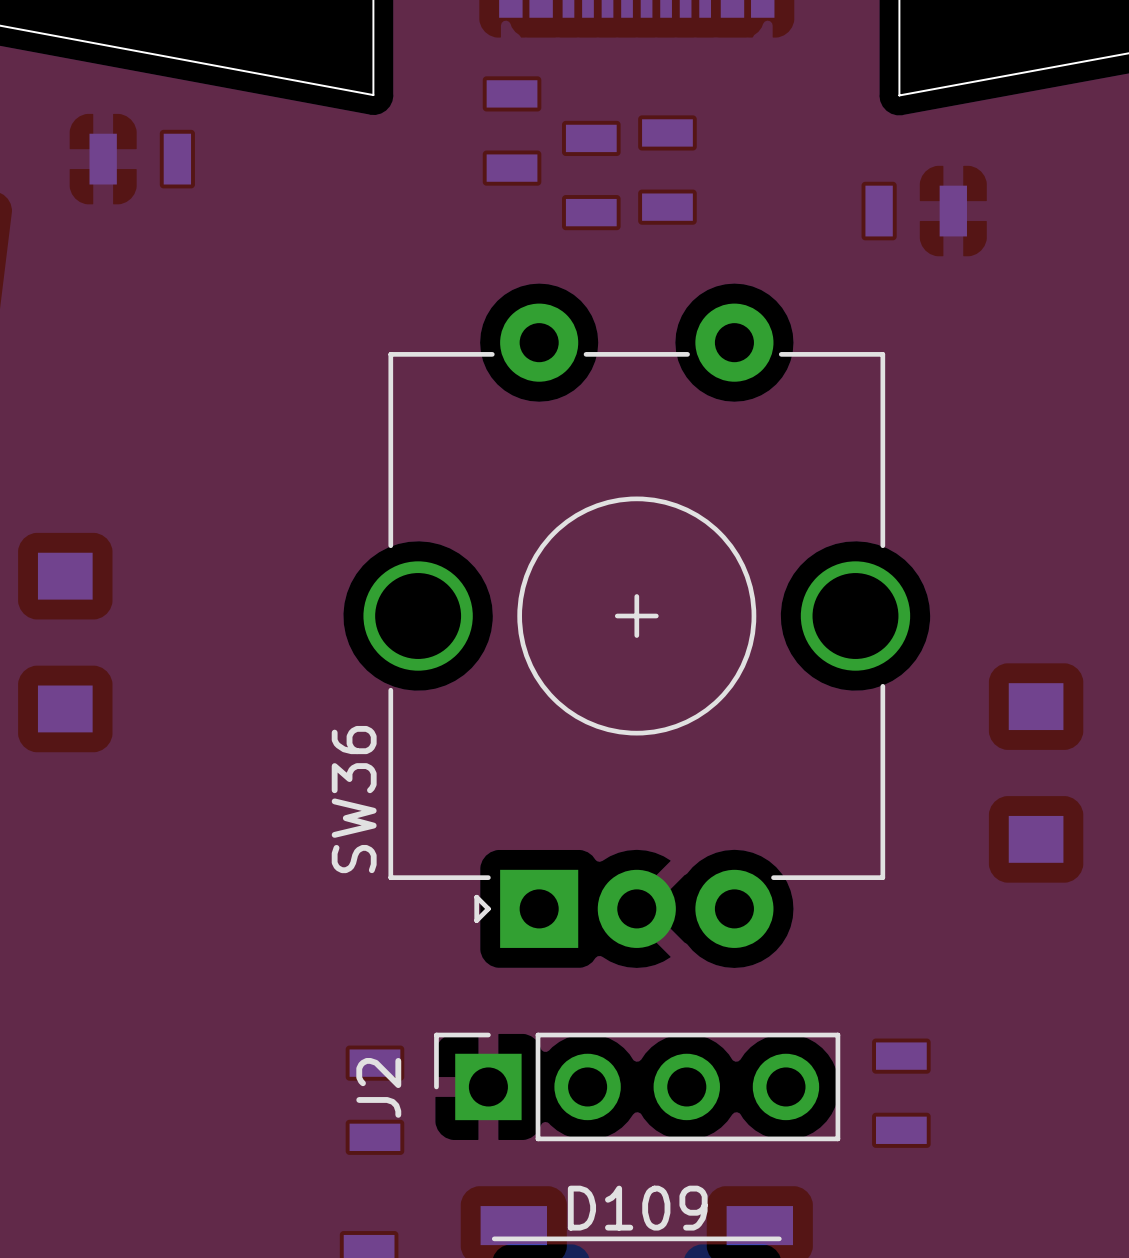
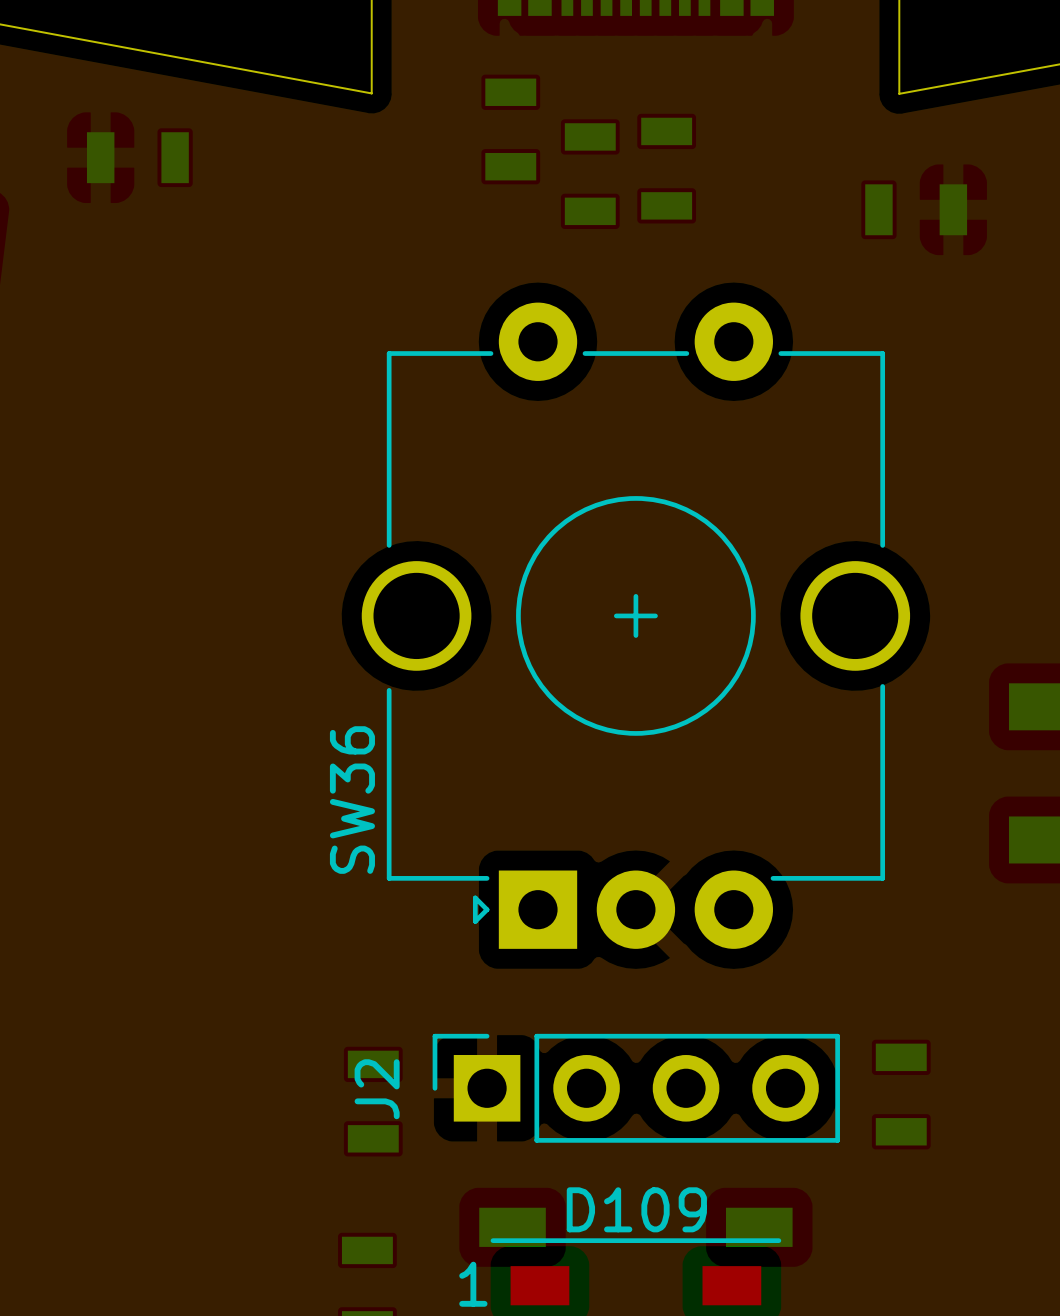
part: (65, 642) -> none

